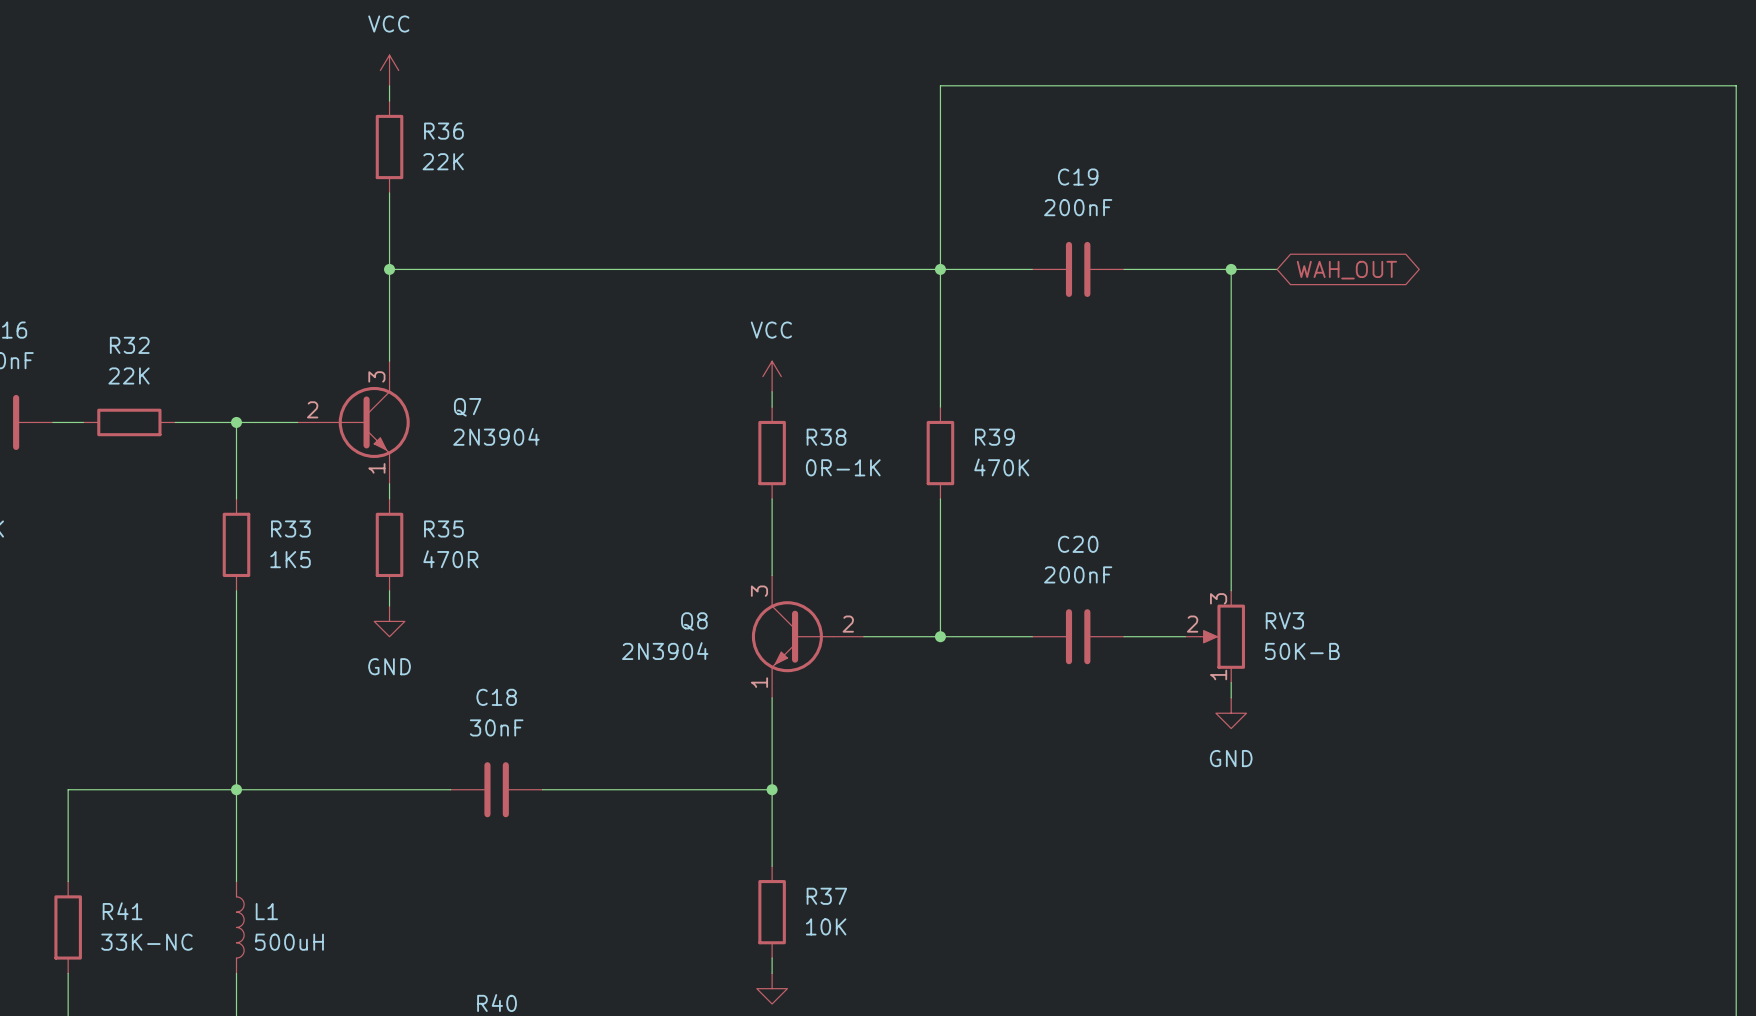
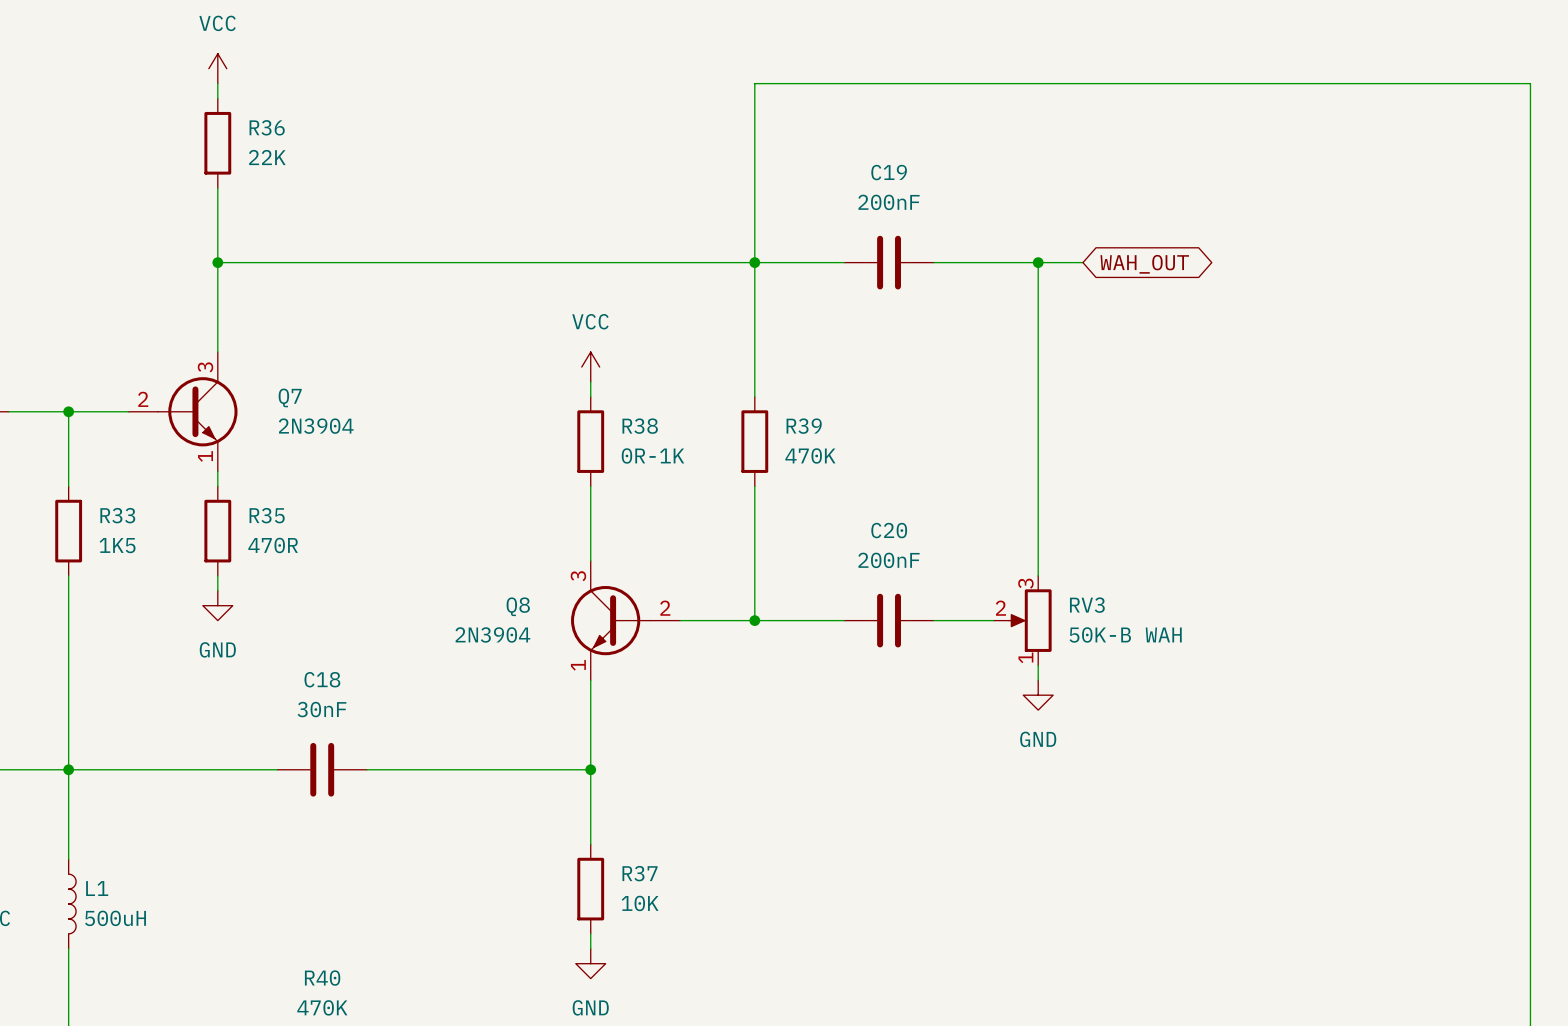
RV3 value: 50K-B (1302, 651) -> 50K-B WAH (1125, 634)

